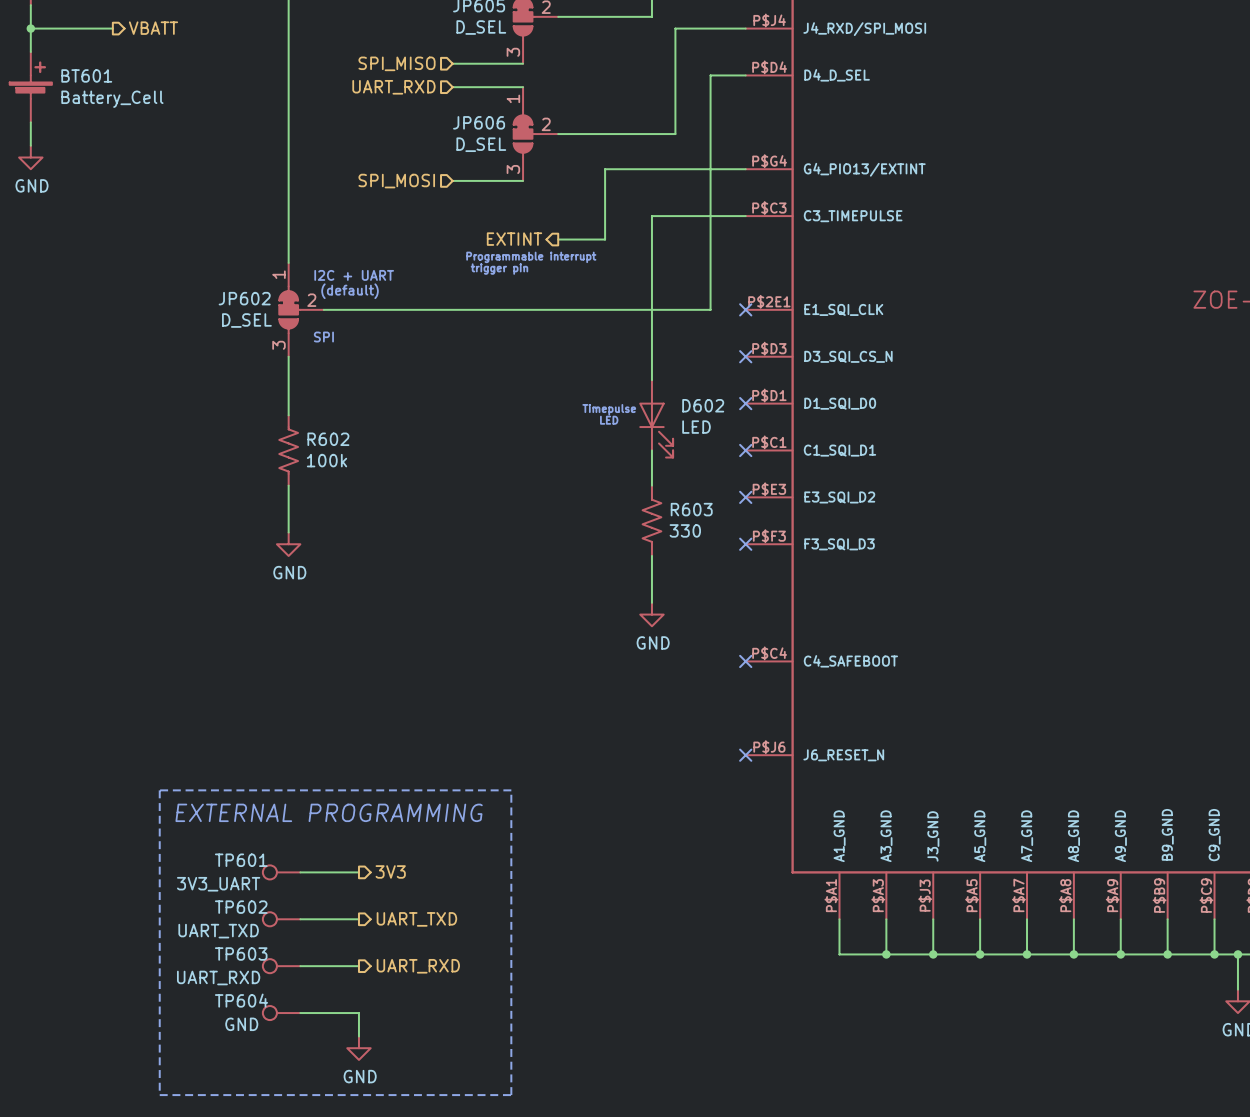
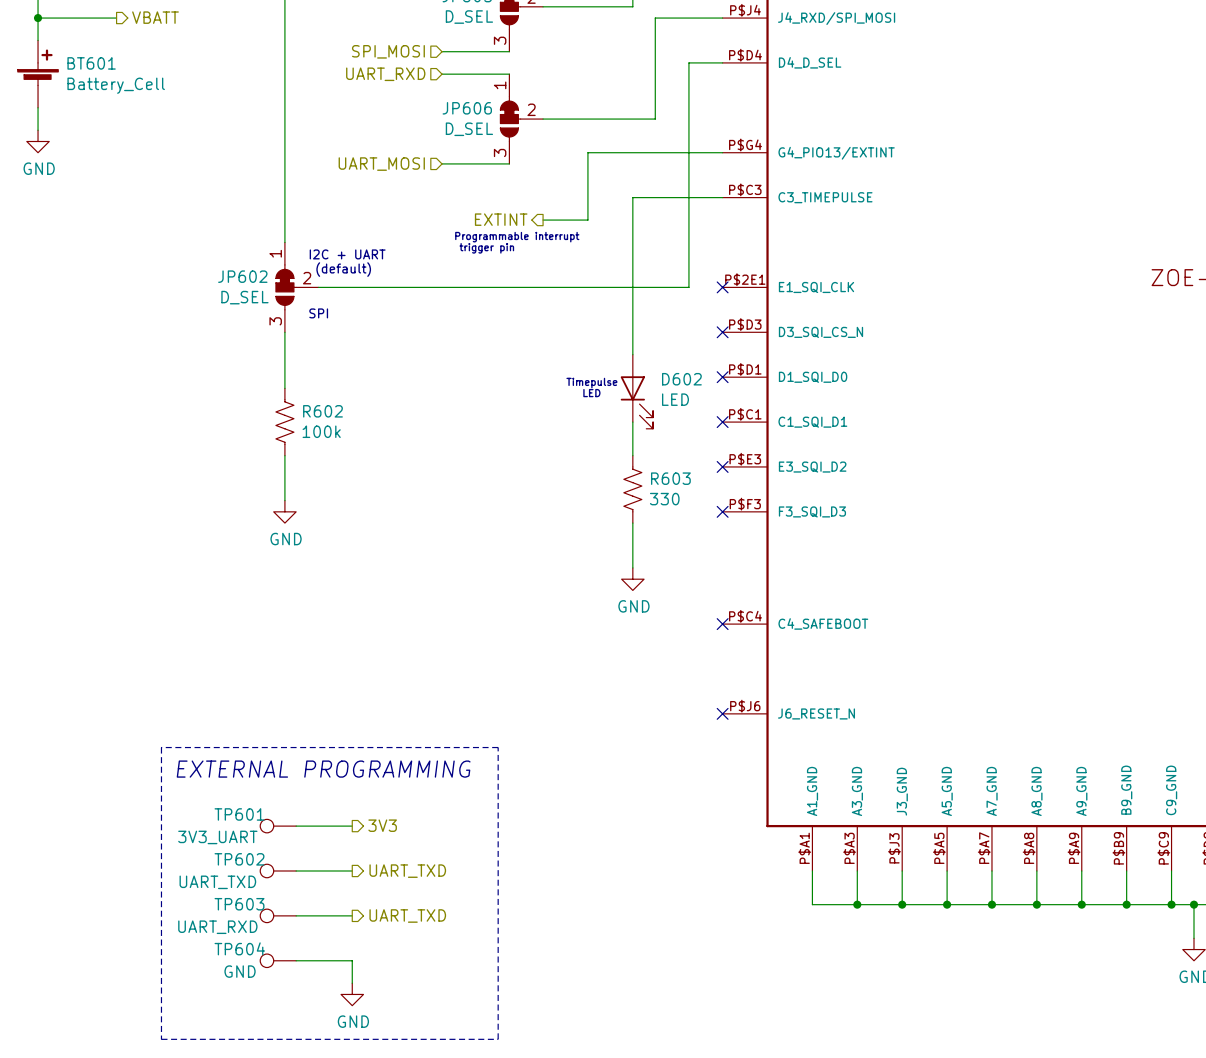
hierarchical label: SPI_MISO (397, 63) -> SPI_MOSI (388, 51)
hierarchical label: SPI_MOSI (396, 181) -> UART_MOSI (381, 164)
hierarchical label: UART_RXD (418, 966) -> UART_TXD (407, 916)

